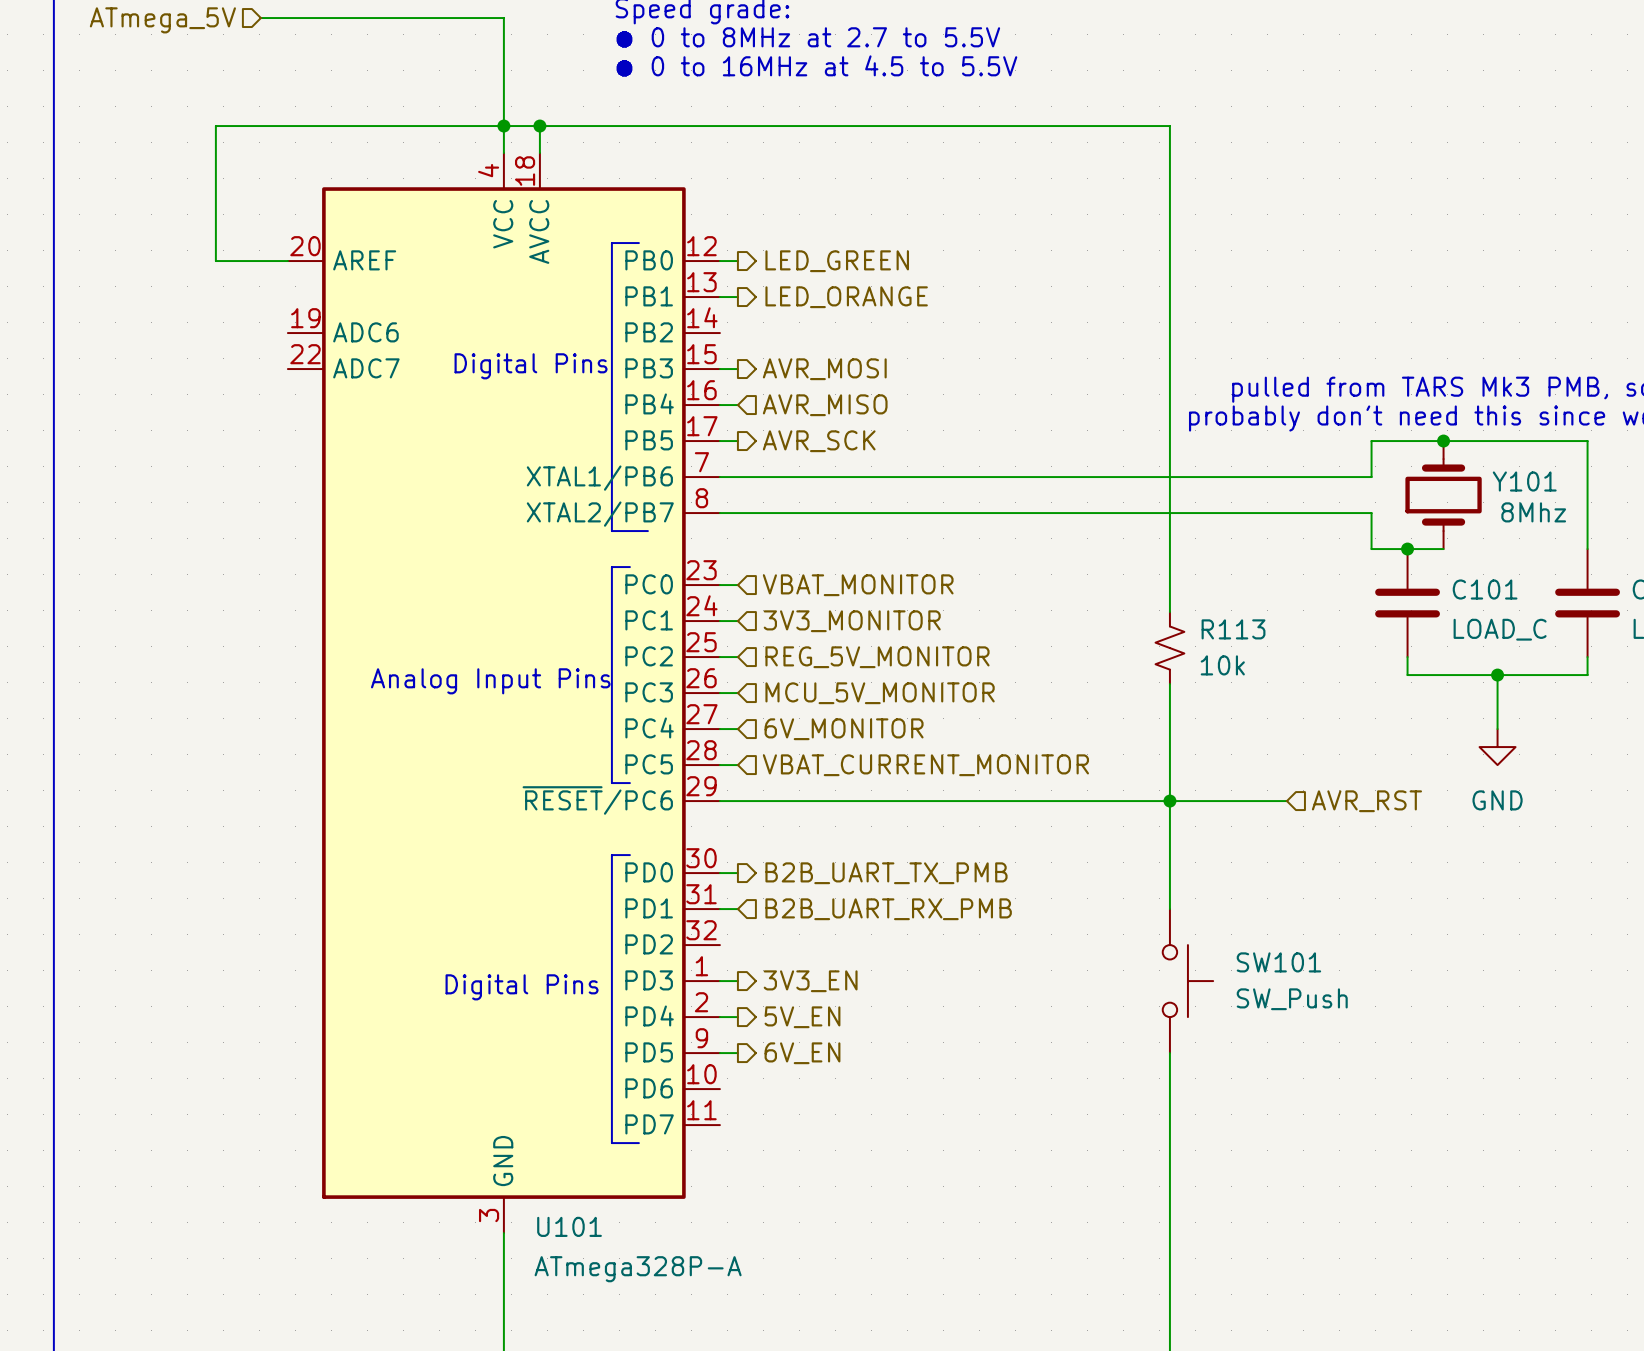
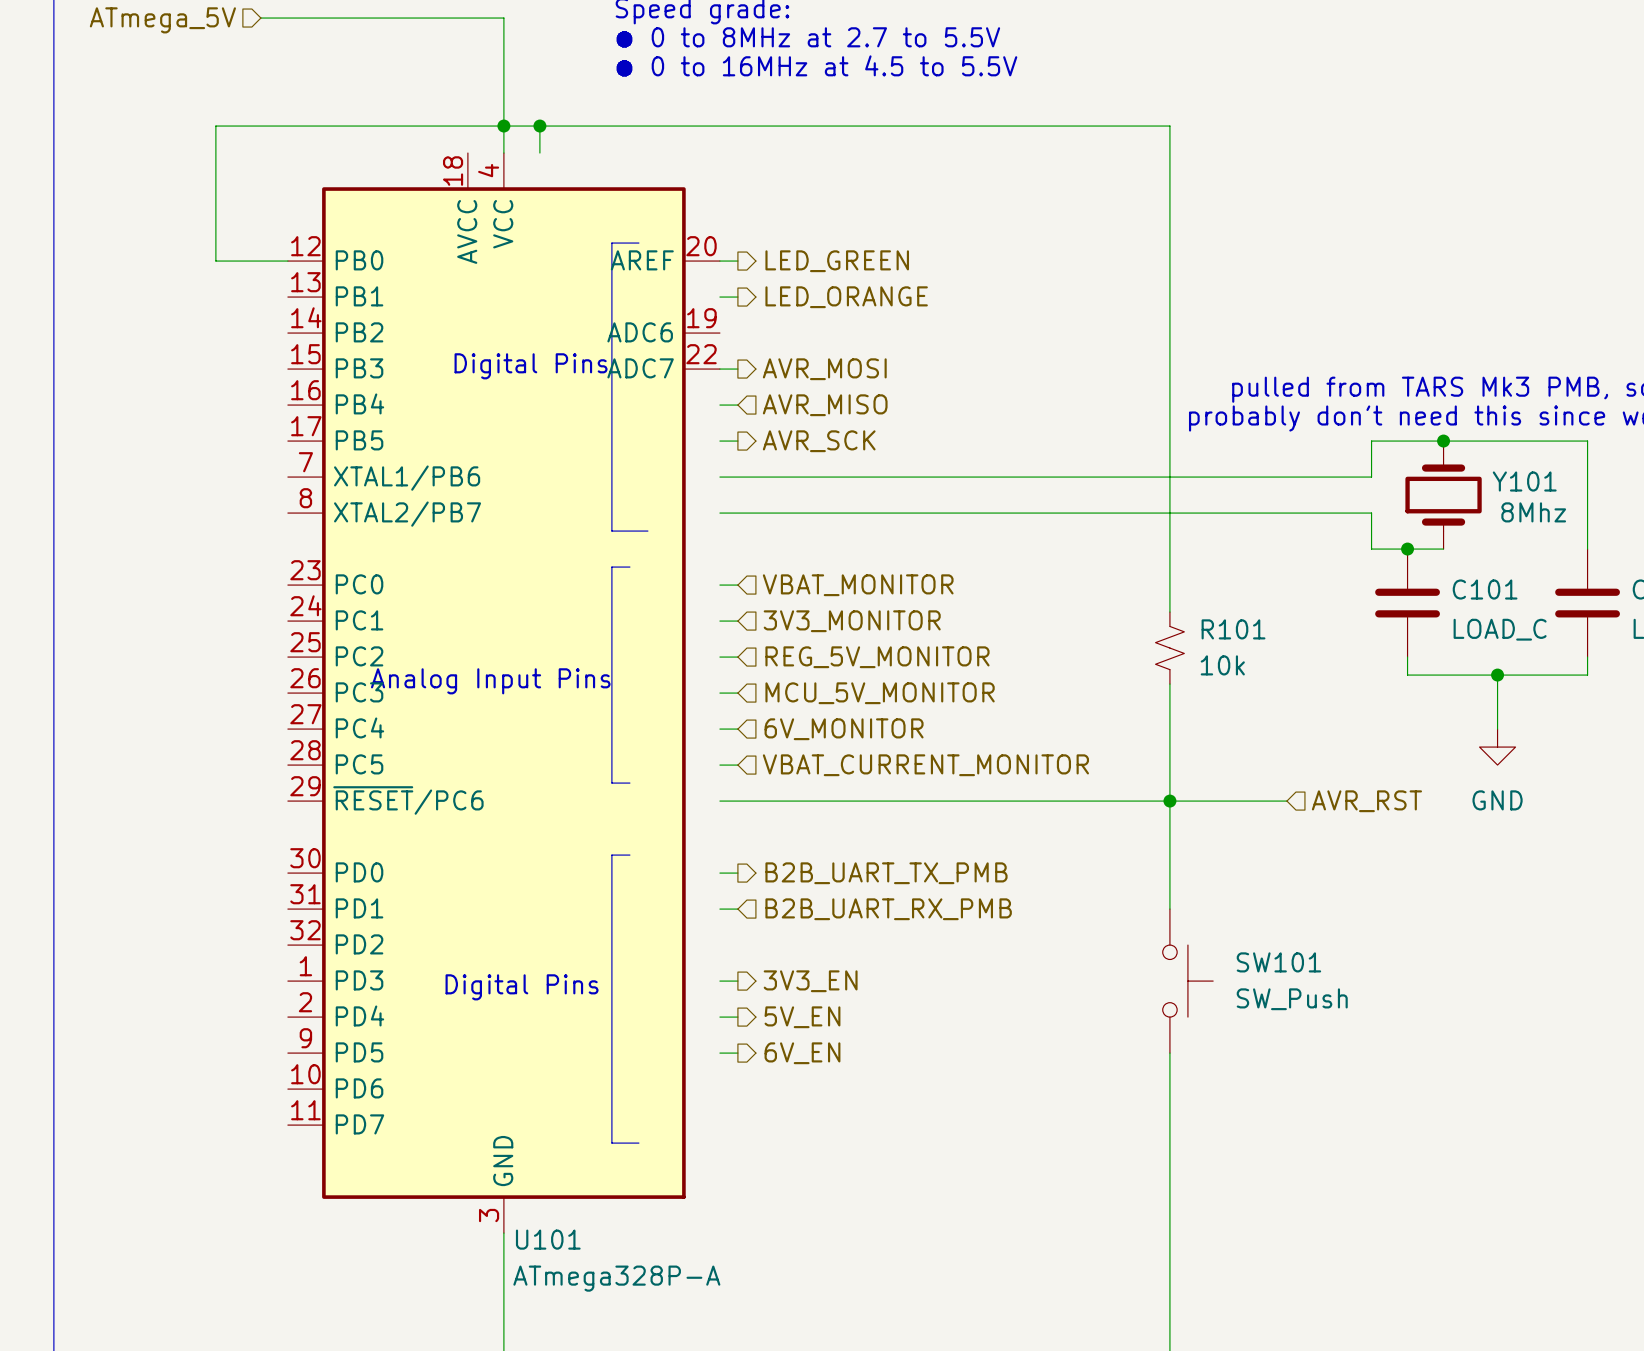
R113 name: R113 (1233, 629) -> R101 (1233, 629)
U101 flip: as is (503, 693) -> left-right (503, 693)

